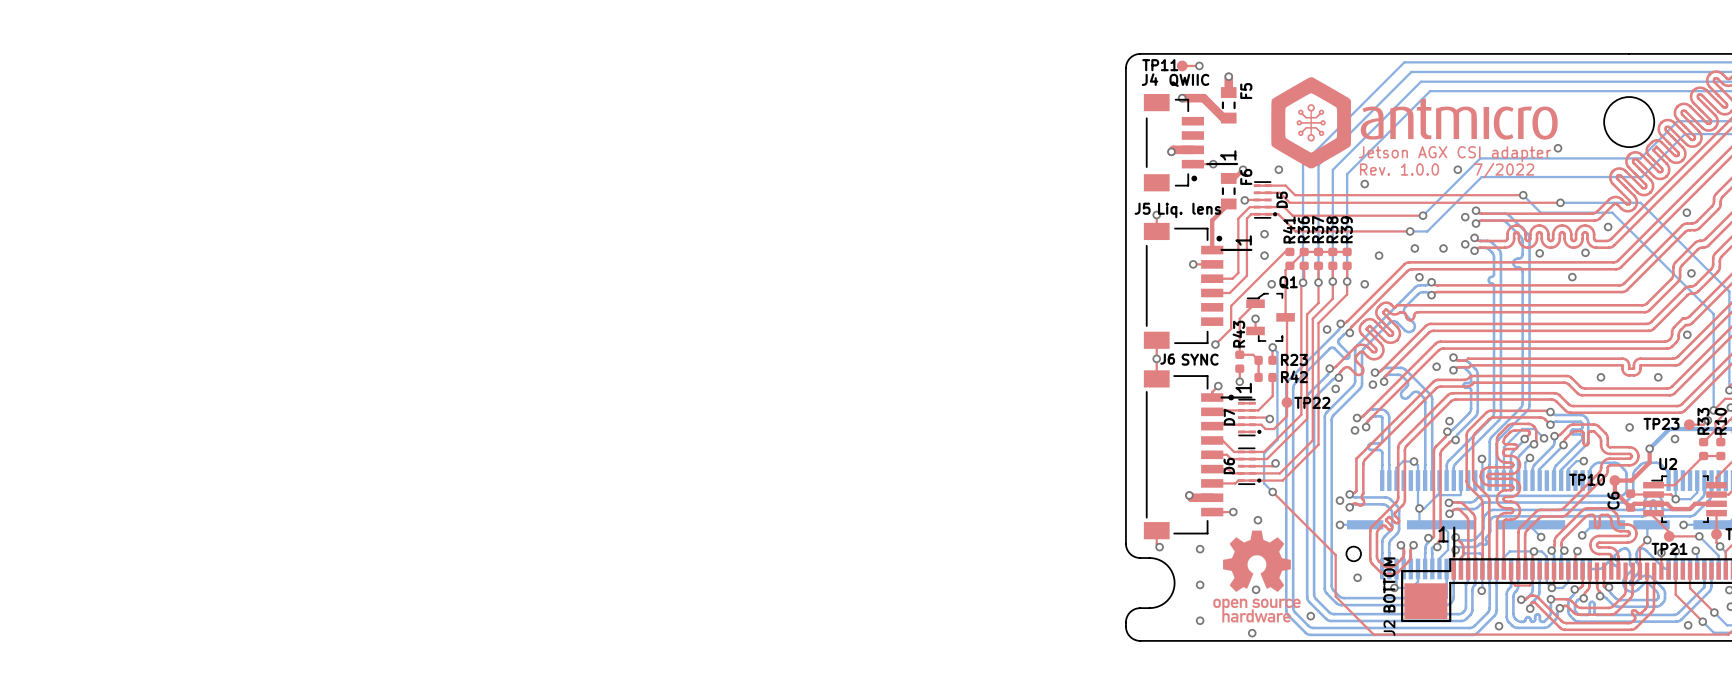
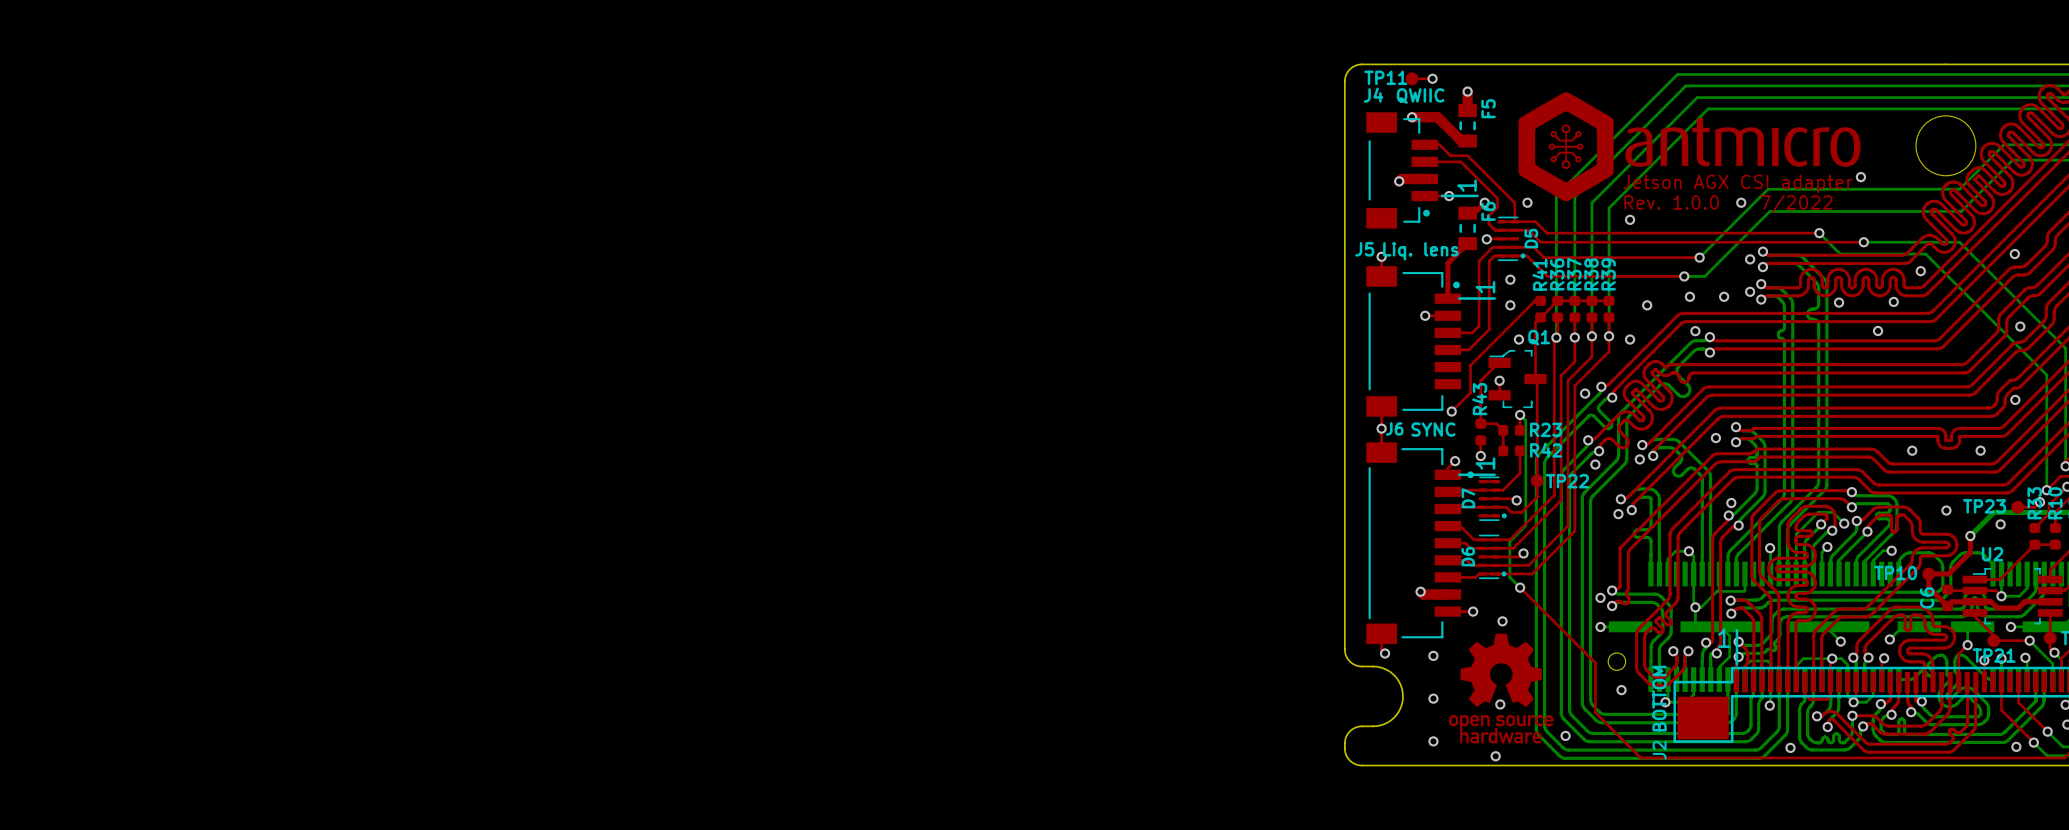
top track: none -> (1424, 144) (1439, 144) (1450, 155) (1467, 155) (1514, 202) (1514, 221)
top track: none -> (1424, 161) (1460, 161) (1497, 198) (1497, 207) (1489, 215) (1489, 224) (1495, 230) (1501, 230)

